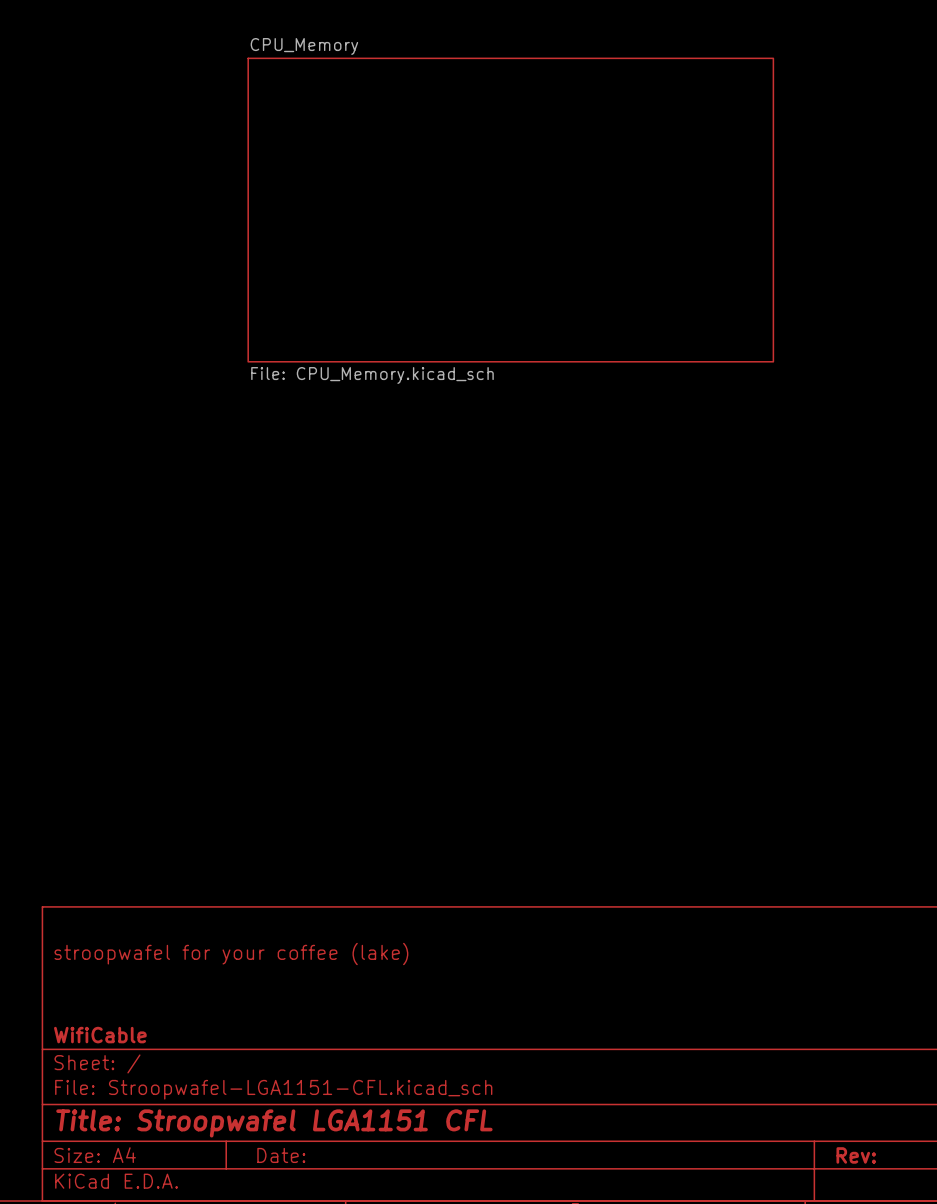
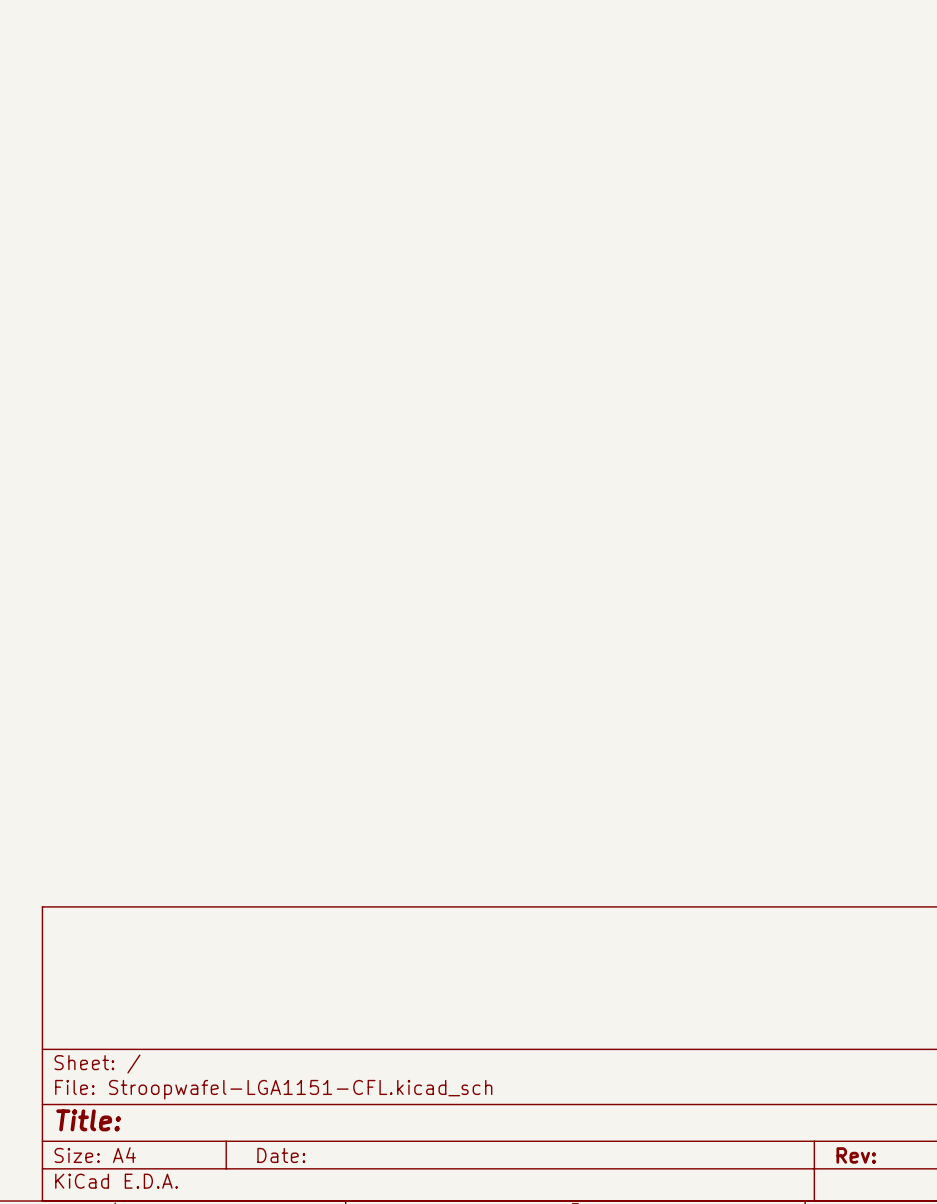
sheet CPU_Memory: File: CPU_Memory.kicad_sch (510, 210) -> none
title block: stroopwafel for your coffee (lake) (231, 954) -> none
title block: WifiCable (100, 1035) -> none
title block: Title: Stroopwafel LGA1151 CFL (274, 1123) -> Title: (88, 1120)

